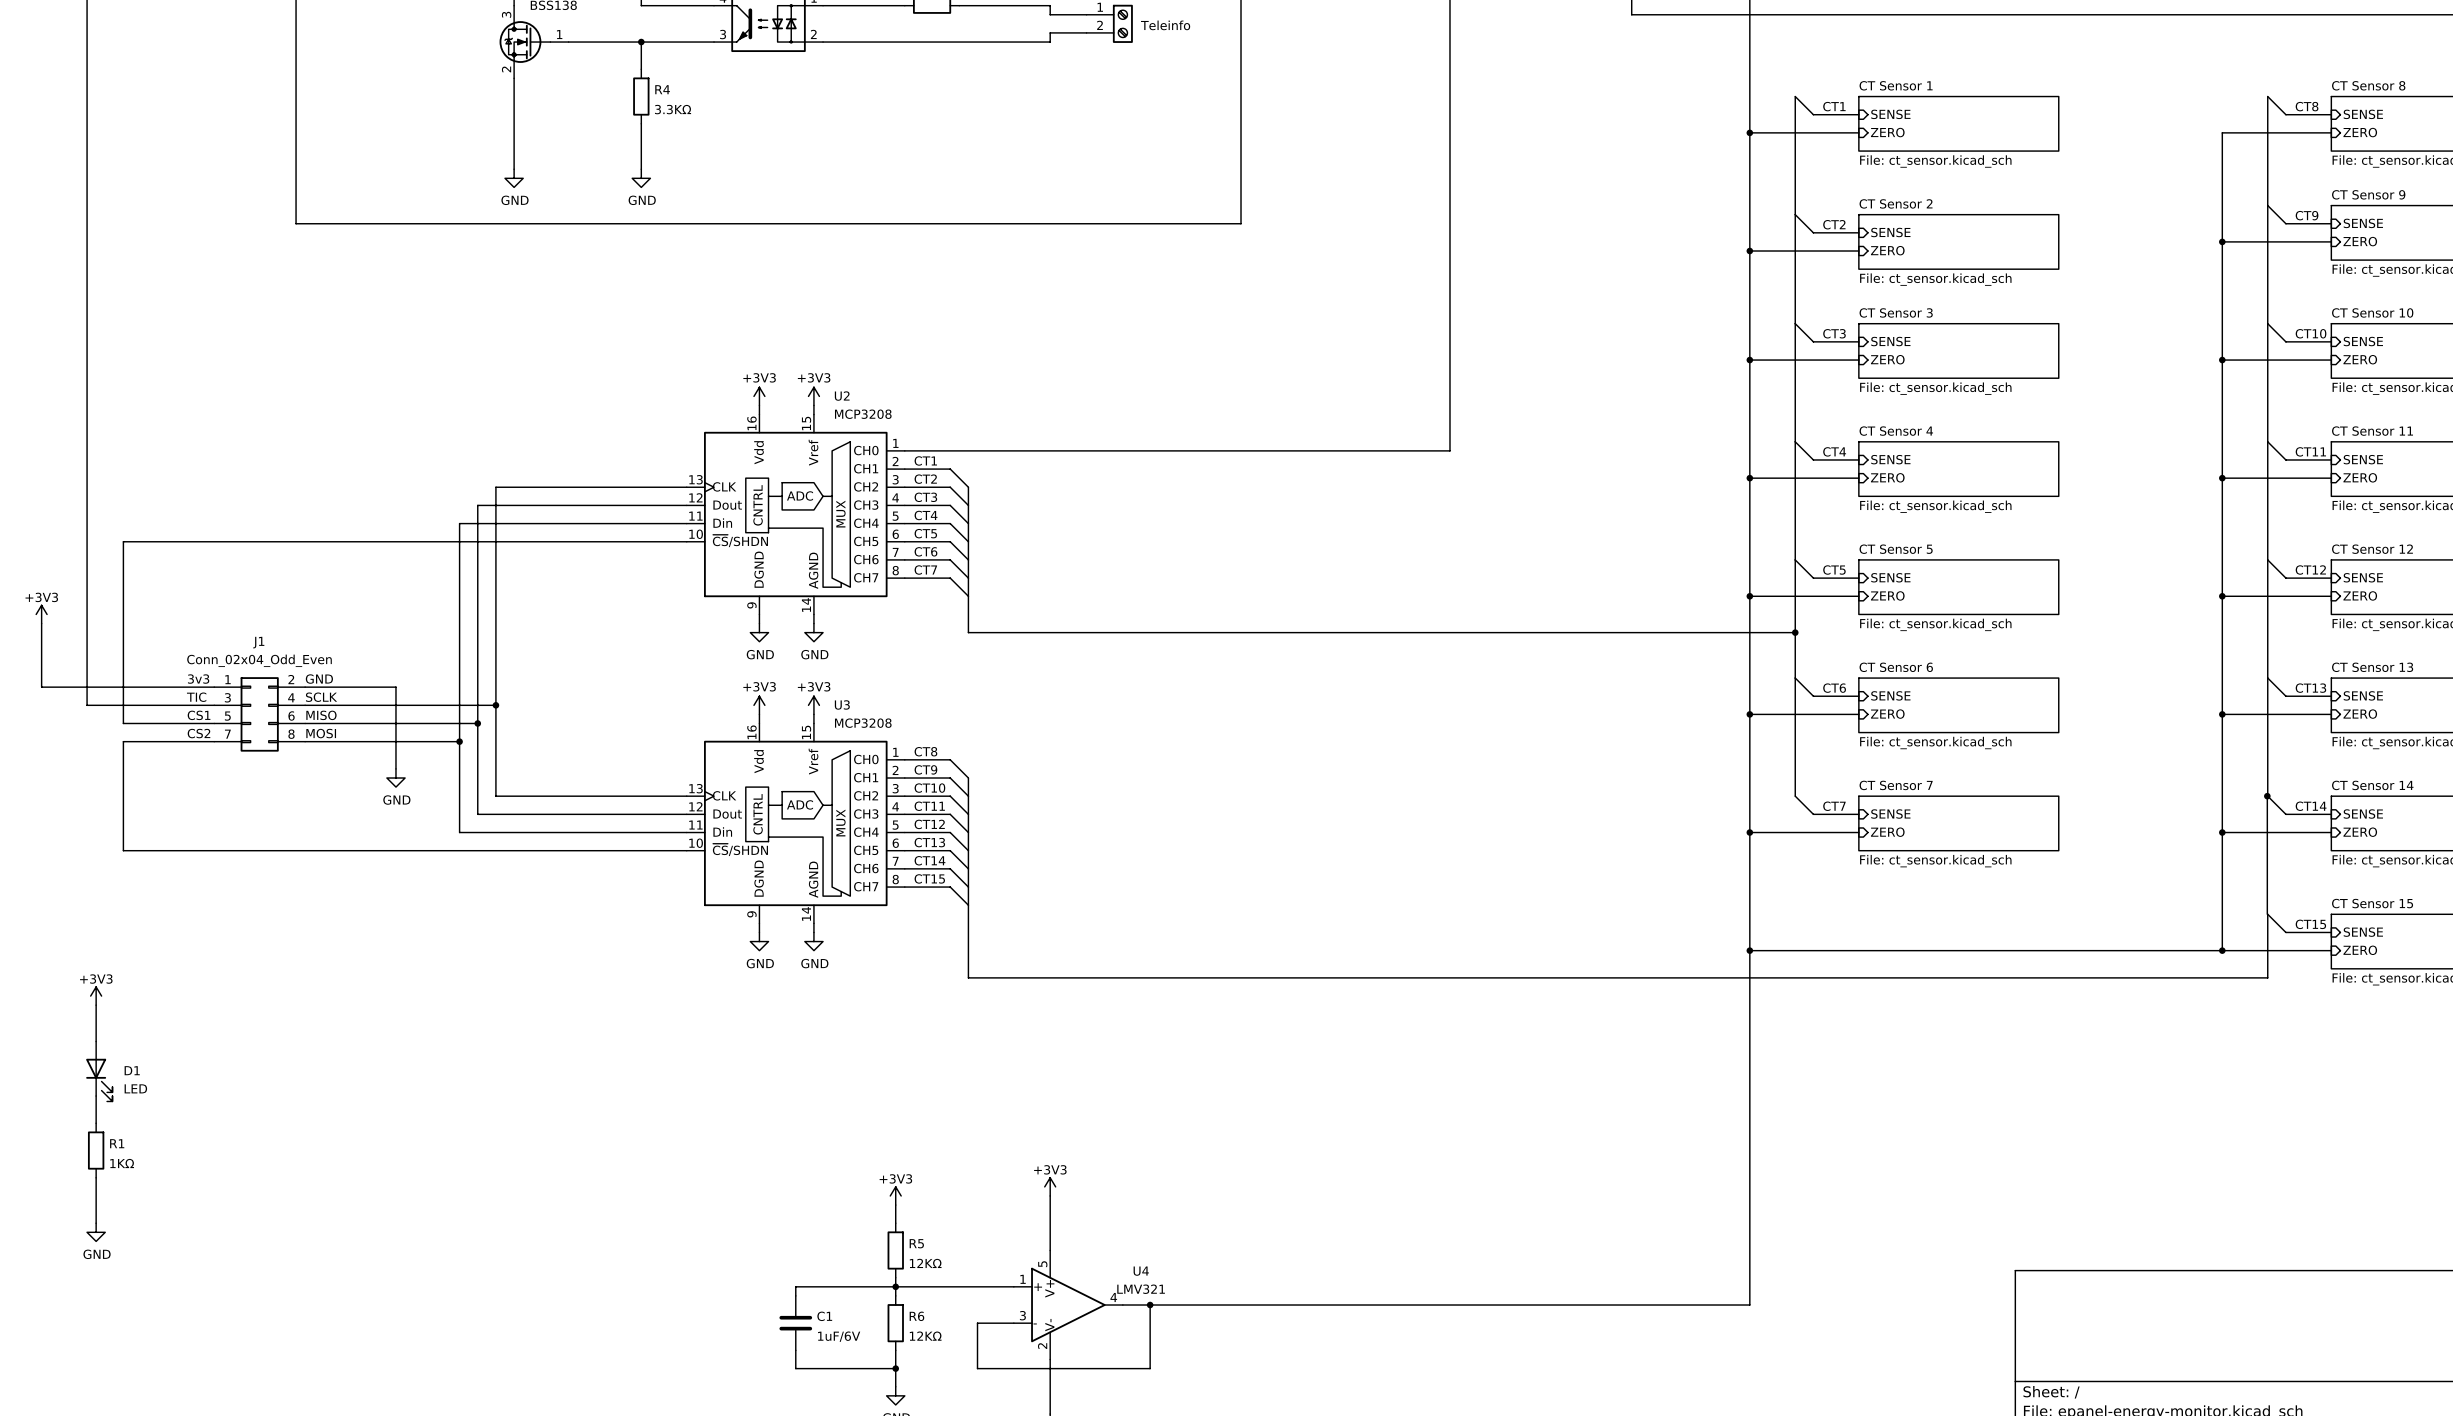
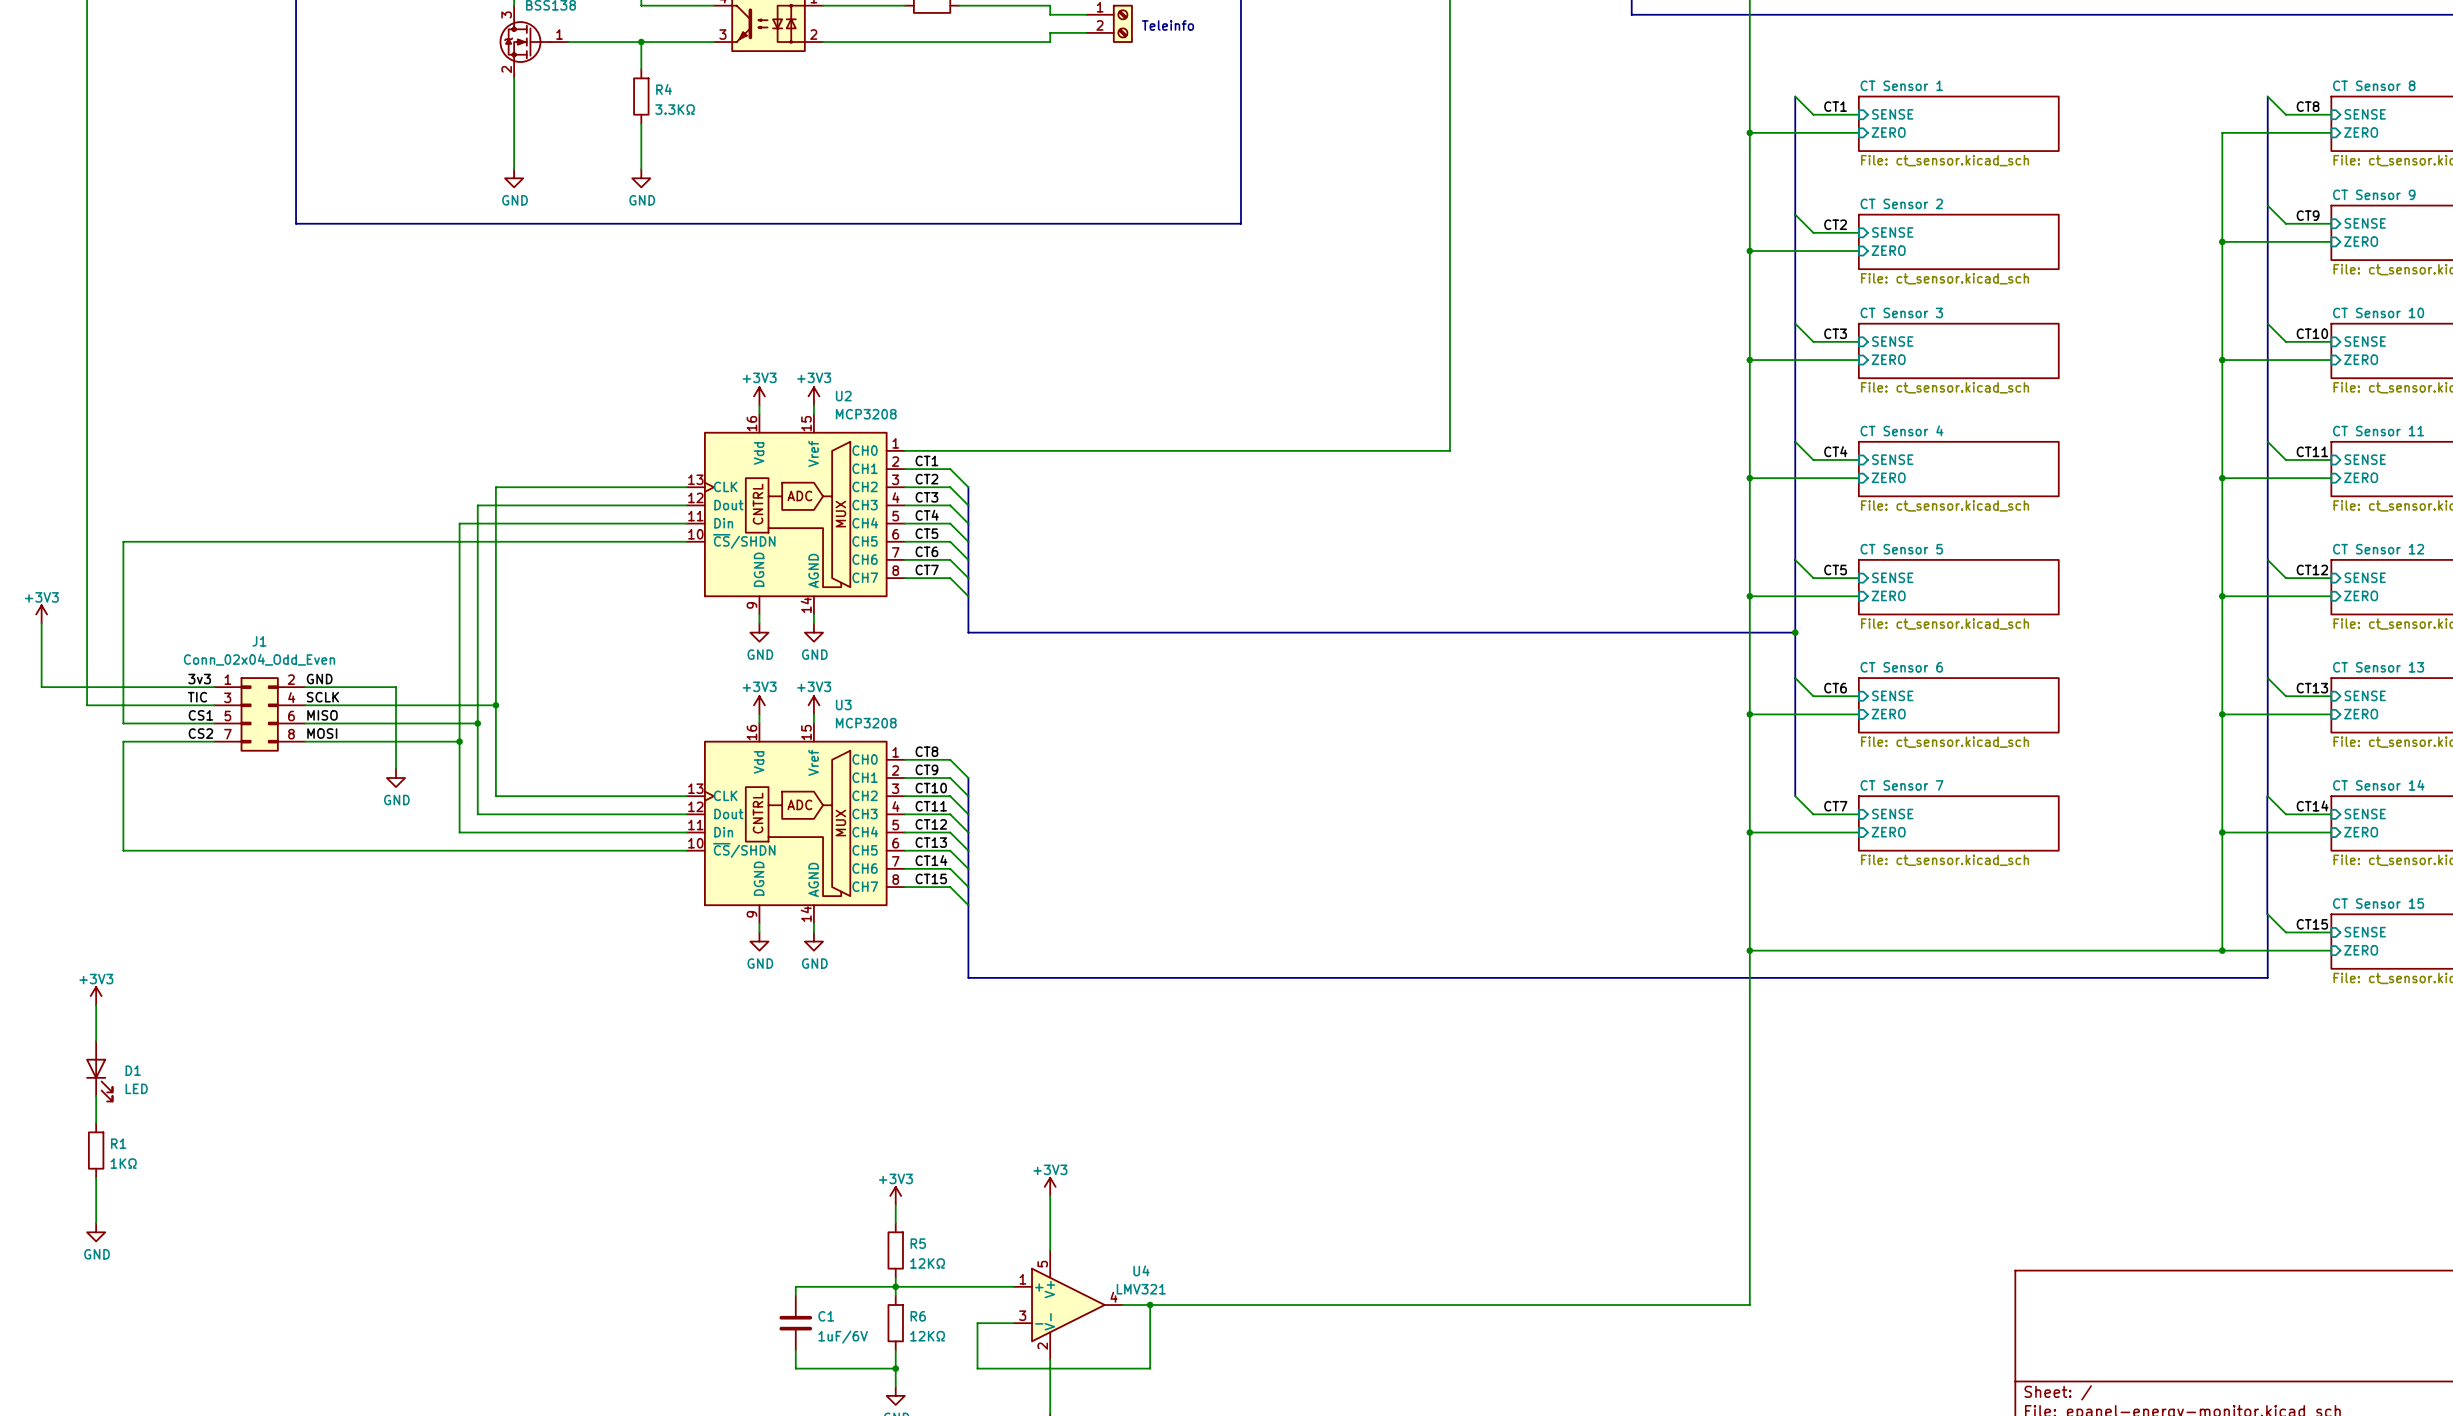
junction: (2267, 796) -> none

